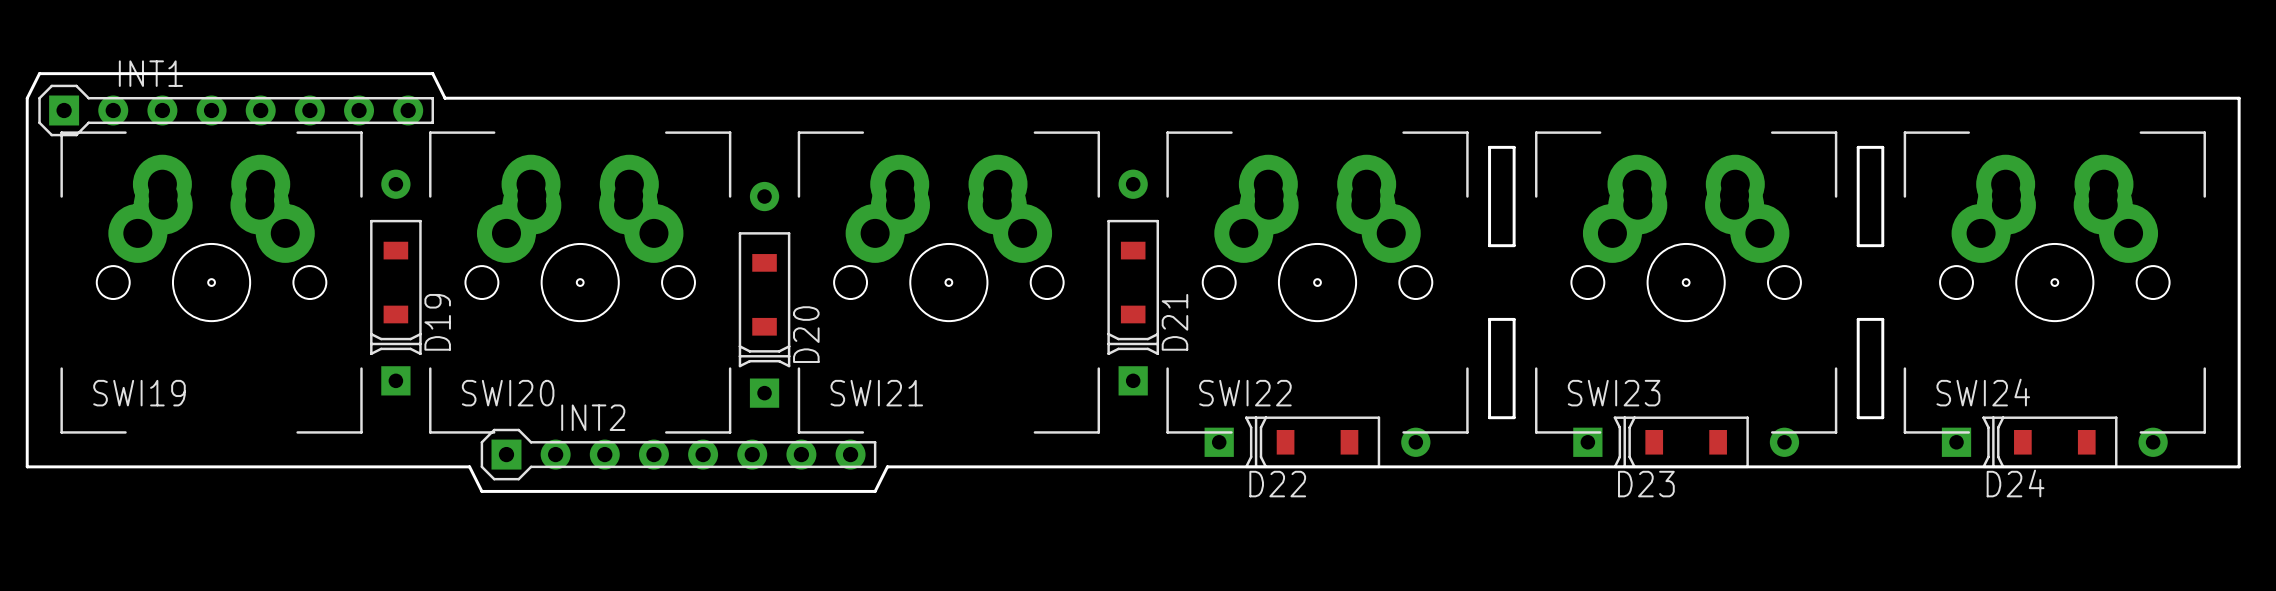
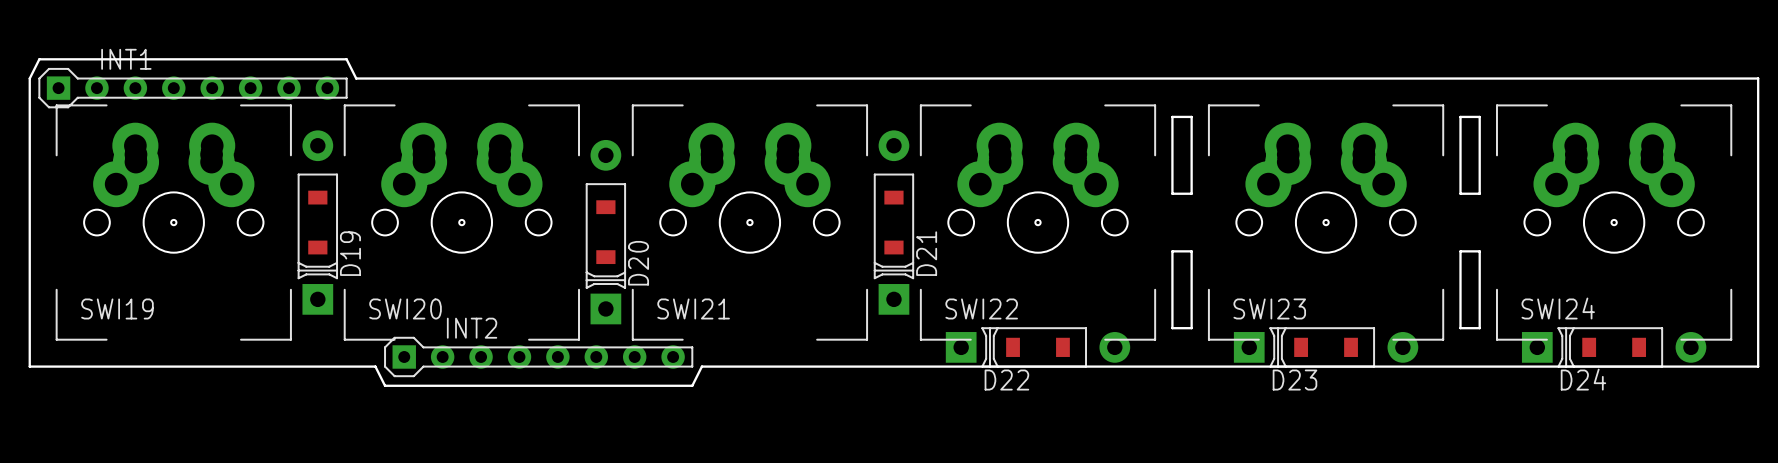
D19 footprint: [370, 169, 422, 396] -> [297, 130, 338, 315]
D21 footprint: [1107, 169, 1159, 396] -> [873, 130, 915, 315]
D20 footprint: [738, 181, 791, 408] -> [585, 139, 627, 325]
D22 footprint: [1204, 416, 1431, 469] -> [945, 327, 1131, 368]
D23 footprint: [1573, 416, 1800, 469] -> [1233, 327, 1419, 368]
D24 footprint: [1941, 416, 2168, 469] -> [1521, 327, 1707, 368]

